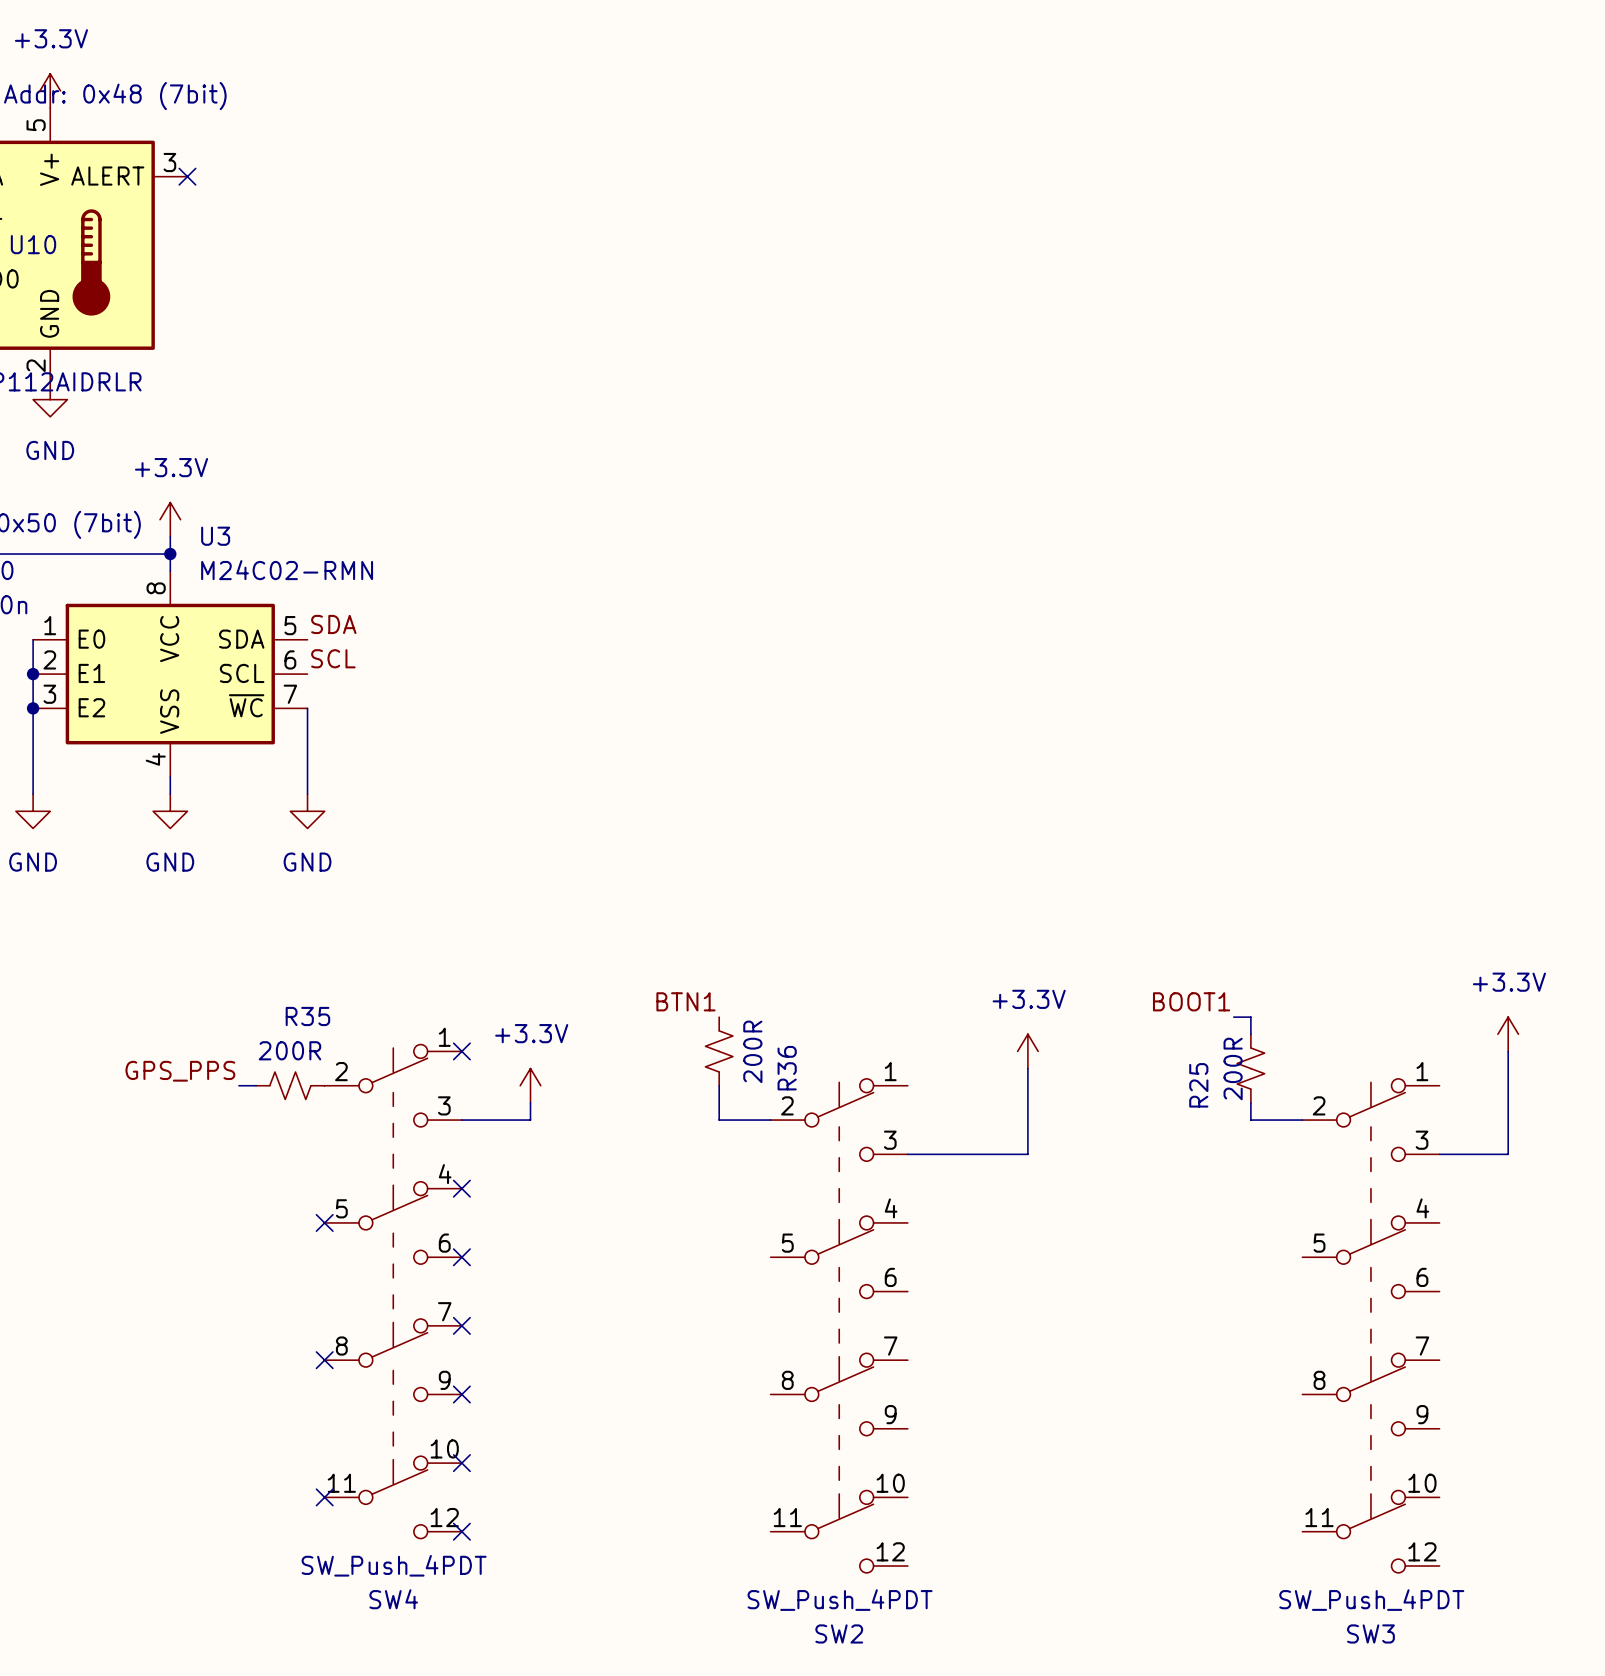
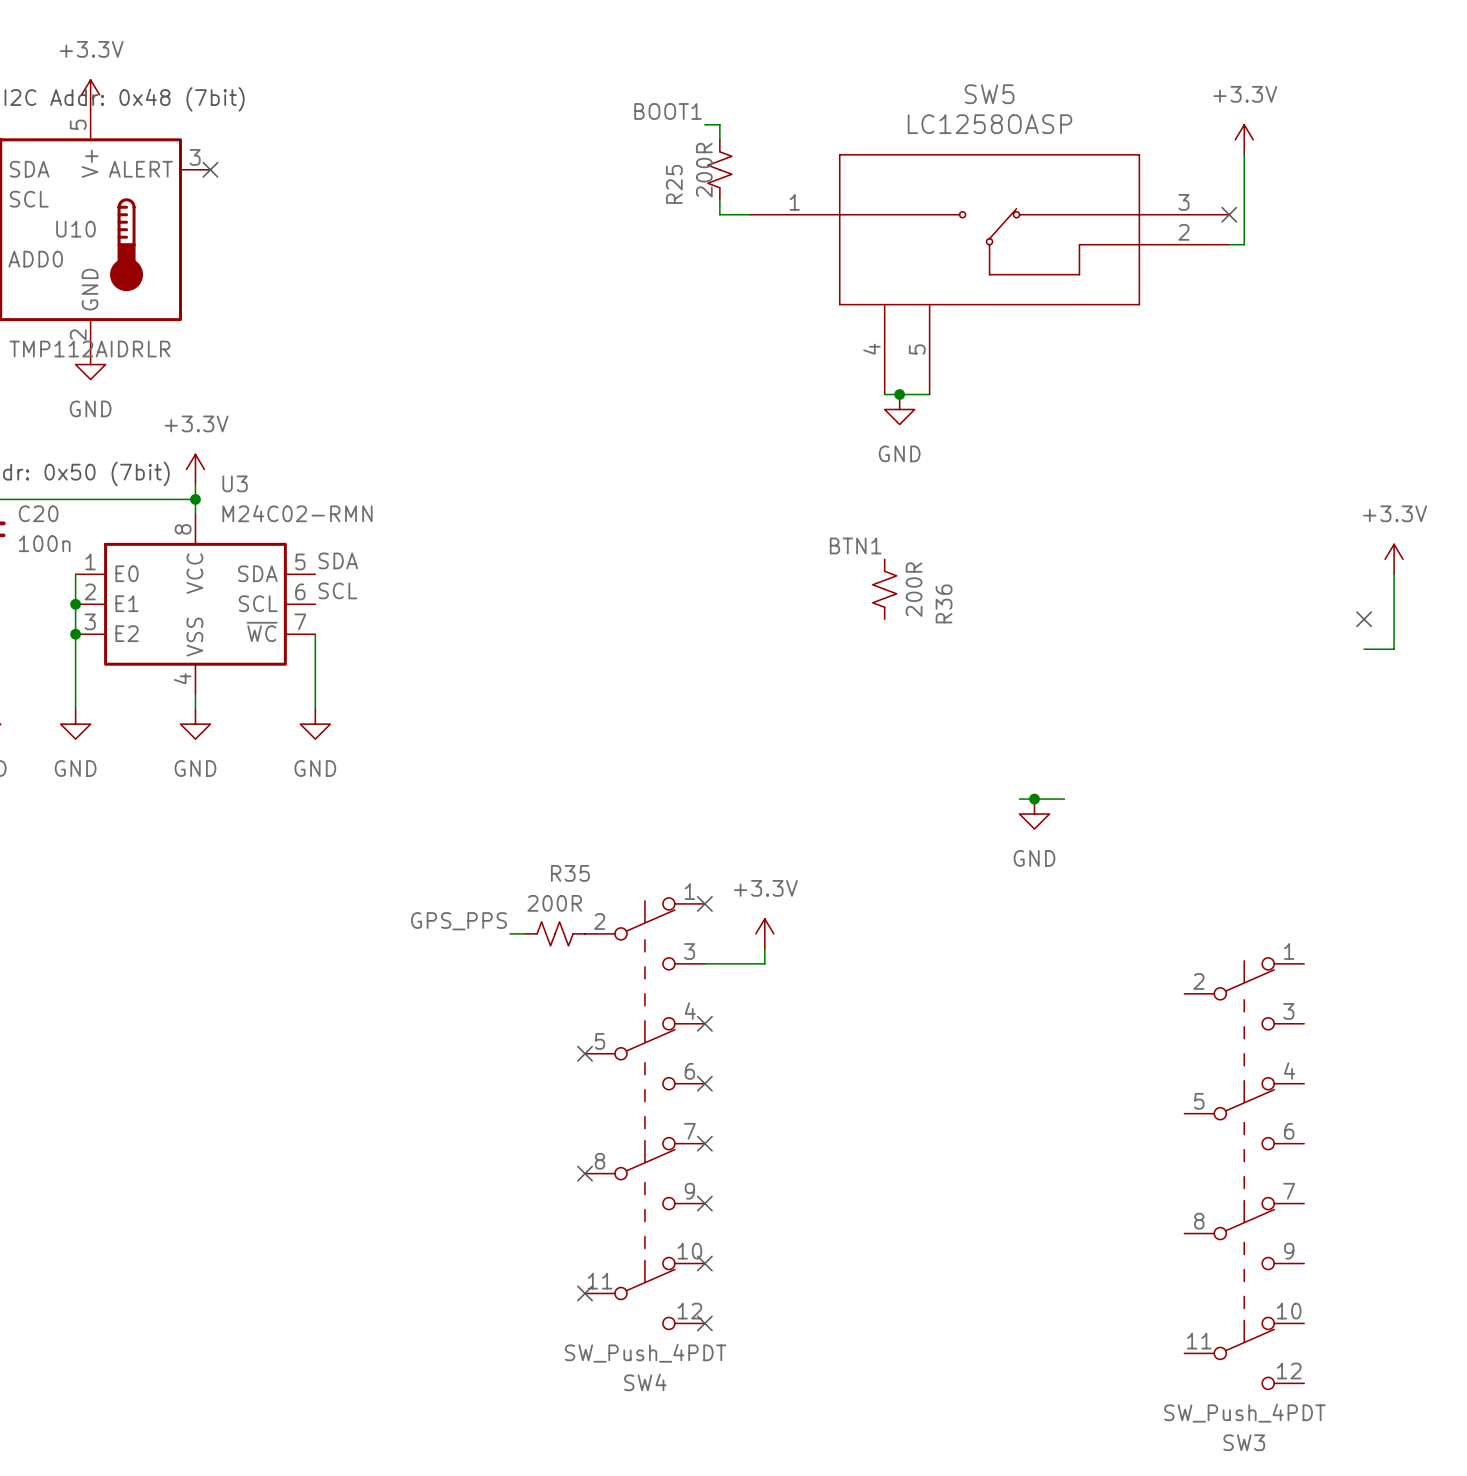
label: none -> BOOT1 (668, 111)
wire: none -> (704, 124) (719, 124) (719, 139)
power symbol: none -> +3.3V (1244, 139)
wire: none -> (1244, 154) (1244, 244) (1229, 244)
wire: none -> (719, 199) (719, 214) (749, 214)
no-connect mark: none -> (1229, 214)
SW5: none -> LC1258OASP (989, 274)
wire: none -> (884, 394) (929, 394)
junction: none -> (899, 394)
power symbol: none -> GND (899, 409)
label: none -> BTN1 (855, 545)
power symbol: none -> +3.3V (1394, 559)
wire: none -> (1394, 574) (1394, 649) (1364, 649)
no-connect mark: none -> (1364, 619)
wire: none -> (1019, 799) (1064, 799)
junction: none -> (1034, 799)
power symbol: none -> GND (1034, 814)
label: BTN1 (685, 1001) -> none
label: BOOT1 (1191, 1001) -> none
no-connect mark: none -> (704, 903)
wire: (1233, 1017) (1250, 1017) (1250, 1034) -> none
power symbol: +3.3V (1508, 1034) -> none
no-connect mark: (461, 1051) -> none
R36 position: (719, 1051) -> (884, 589)
power symbol: none -> +3.3V (764, 933)
power symbol: +3.3V (1027, 1051) -> none
wire: (1508, 1051) (1508, 1154) (1439, 1154) -> none
wire: (1027, 1068) (1027, 1154) (907, 1154) -> none
R25 position: (1250, 1068) -> (719, 169)
label position: GPS_PPS (180, 1071) -> GPS_PPS (458, 921)
wire: (238, 1085) (256, 1085) -> (510, 933) (525, 933)
R35 position: (290, 1085) -> (555, 933)
power symbol: +3.3V (530, 1085) -> none
wire: (719, 1085) (719, 1120) (770, 1120) -> none
wire: (530, 1102) (530, 1120) (461, 1120) -> (764, 948) (764, 963) (704, 963)
wire: (1250, 1102) (1250, 1120) (1302, 1120) -> none
no-connect mark: none -> (704, 1023)
no-connect mark: (461, 1188) -> none
no-connect mark: none -> (585, 1053)
no-connect mark: (324, 1222) -> none
no-connect mark: none -> (704, 1083)
no-connect mark: (461, 1257) -> none
SW4 position: (393, 1291) -> (644, 1113)
no-connect mark: none -> (704, 1143)
no-connect mark: (461, 1325) -> none
no-connect mark: none -> (585, 1173)
SW2: SW_Push_4PDT (839, 1325) -> none
no-connect mark: (324, 1360) -> none
no-connect mark: none -> (704, 1203)
no-connect mark: (461, 1394) -> none
no-connect mark: none -> (704, 1263)
no-connect mark: (461, 1463) -> none
no-connect mark: none -> (585, 1293)
no-connect mark: (324, 1497) -> none
no-connect mark: none -> (704, 1323)
no-connect mark: (461, 1531) -> none

